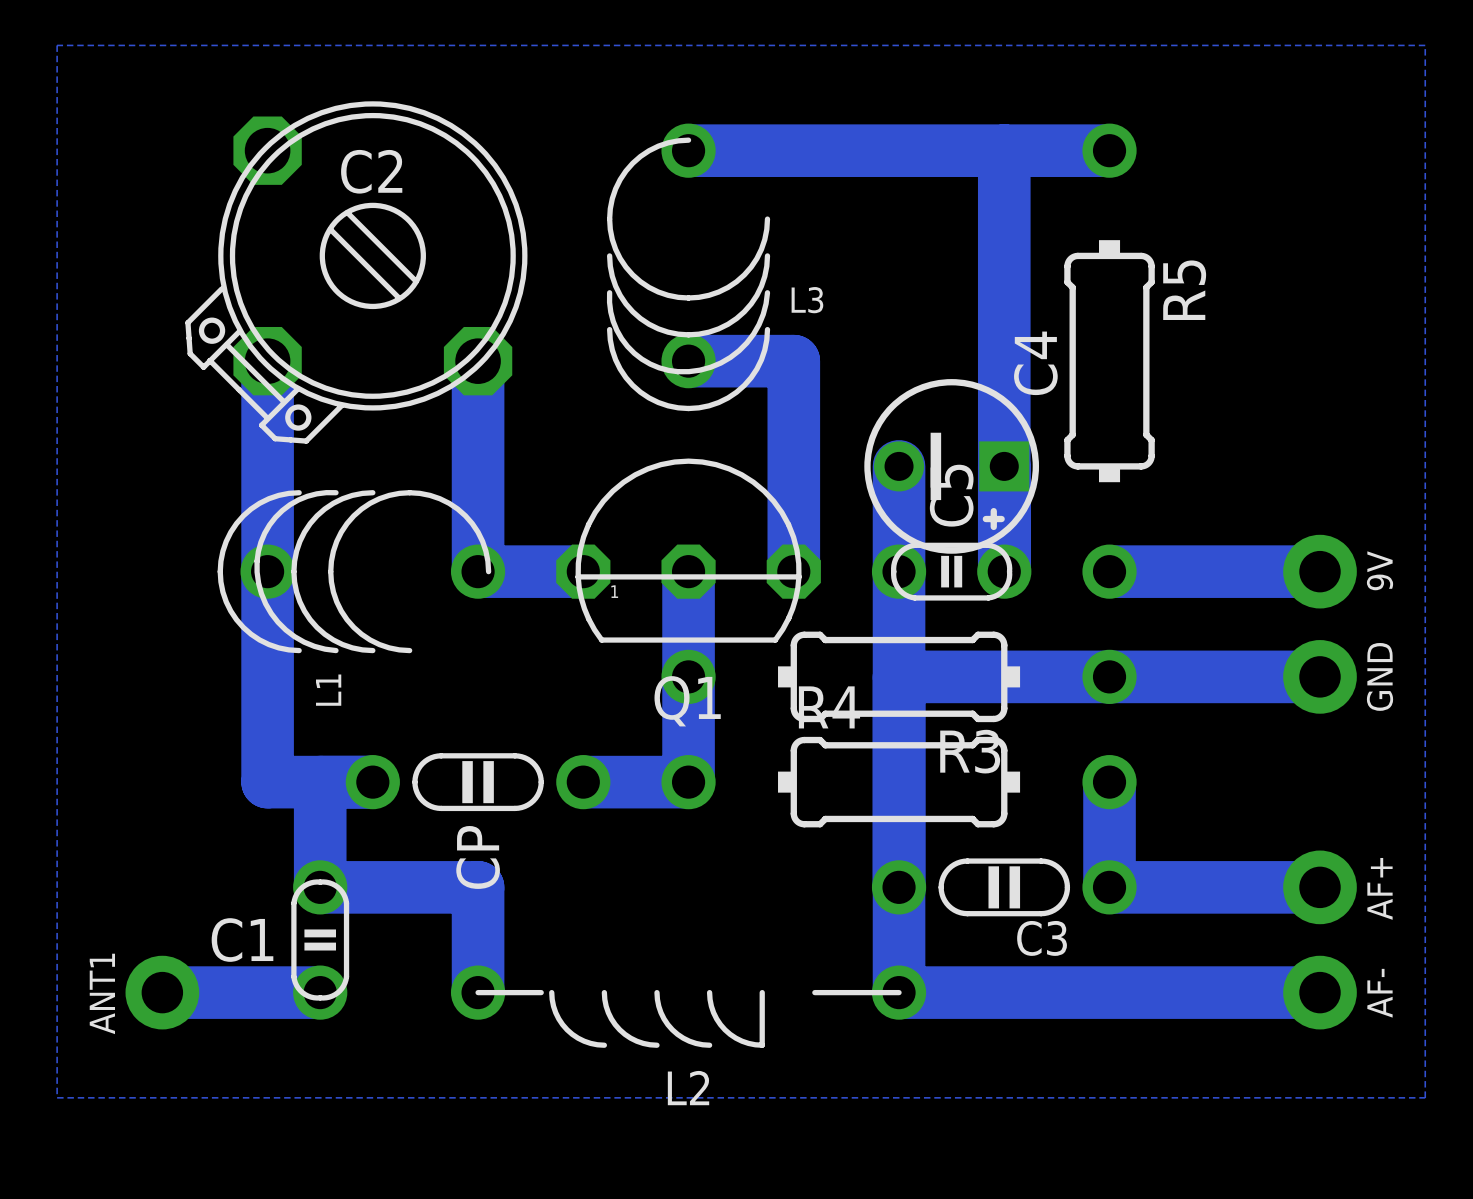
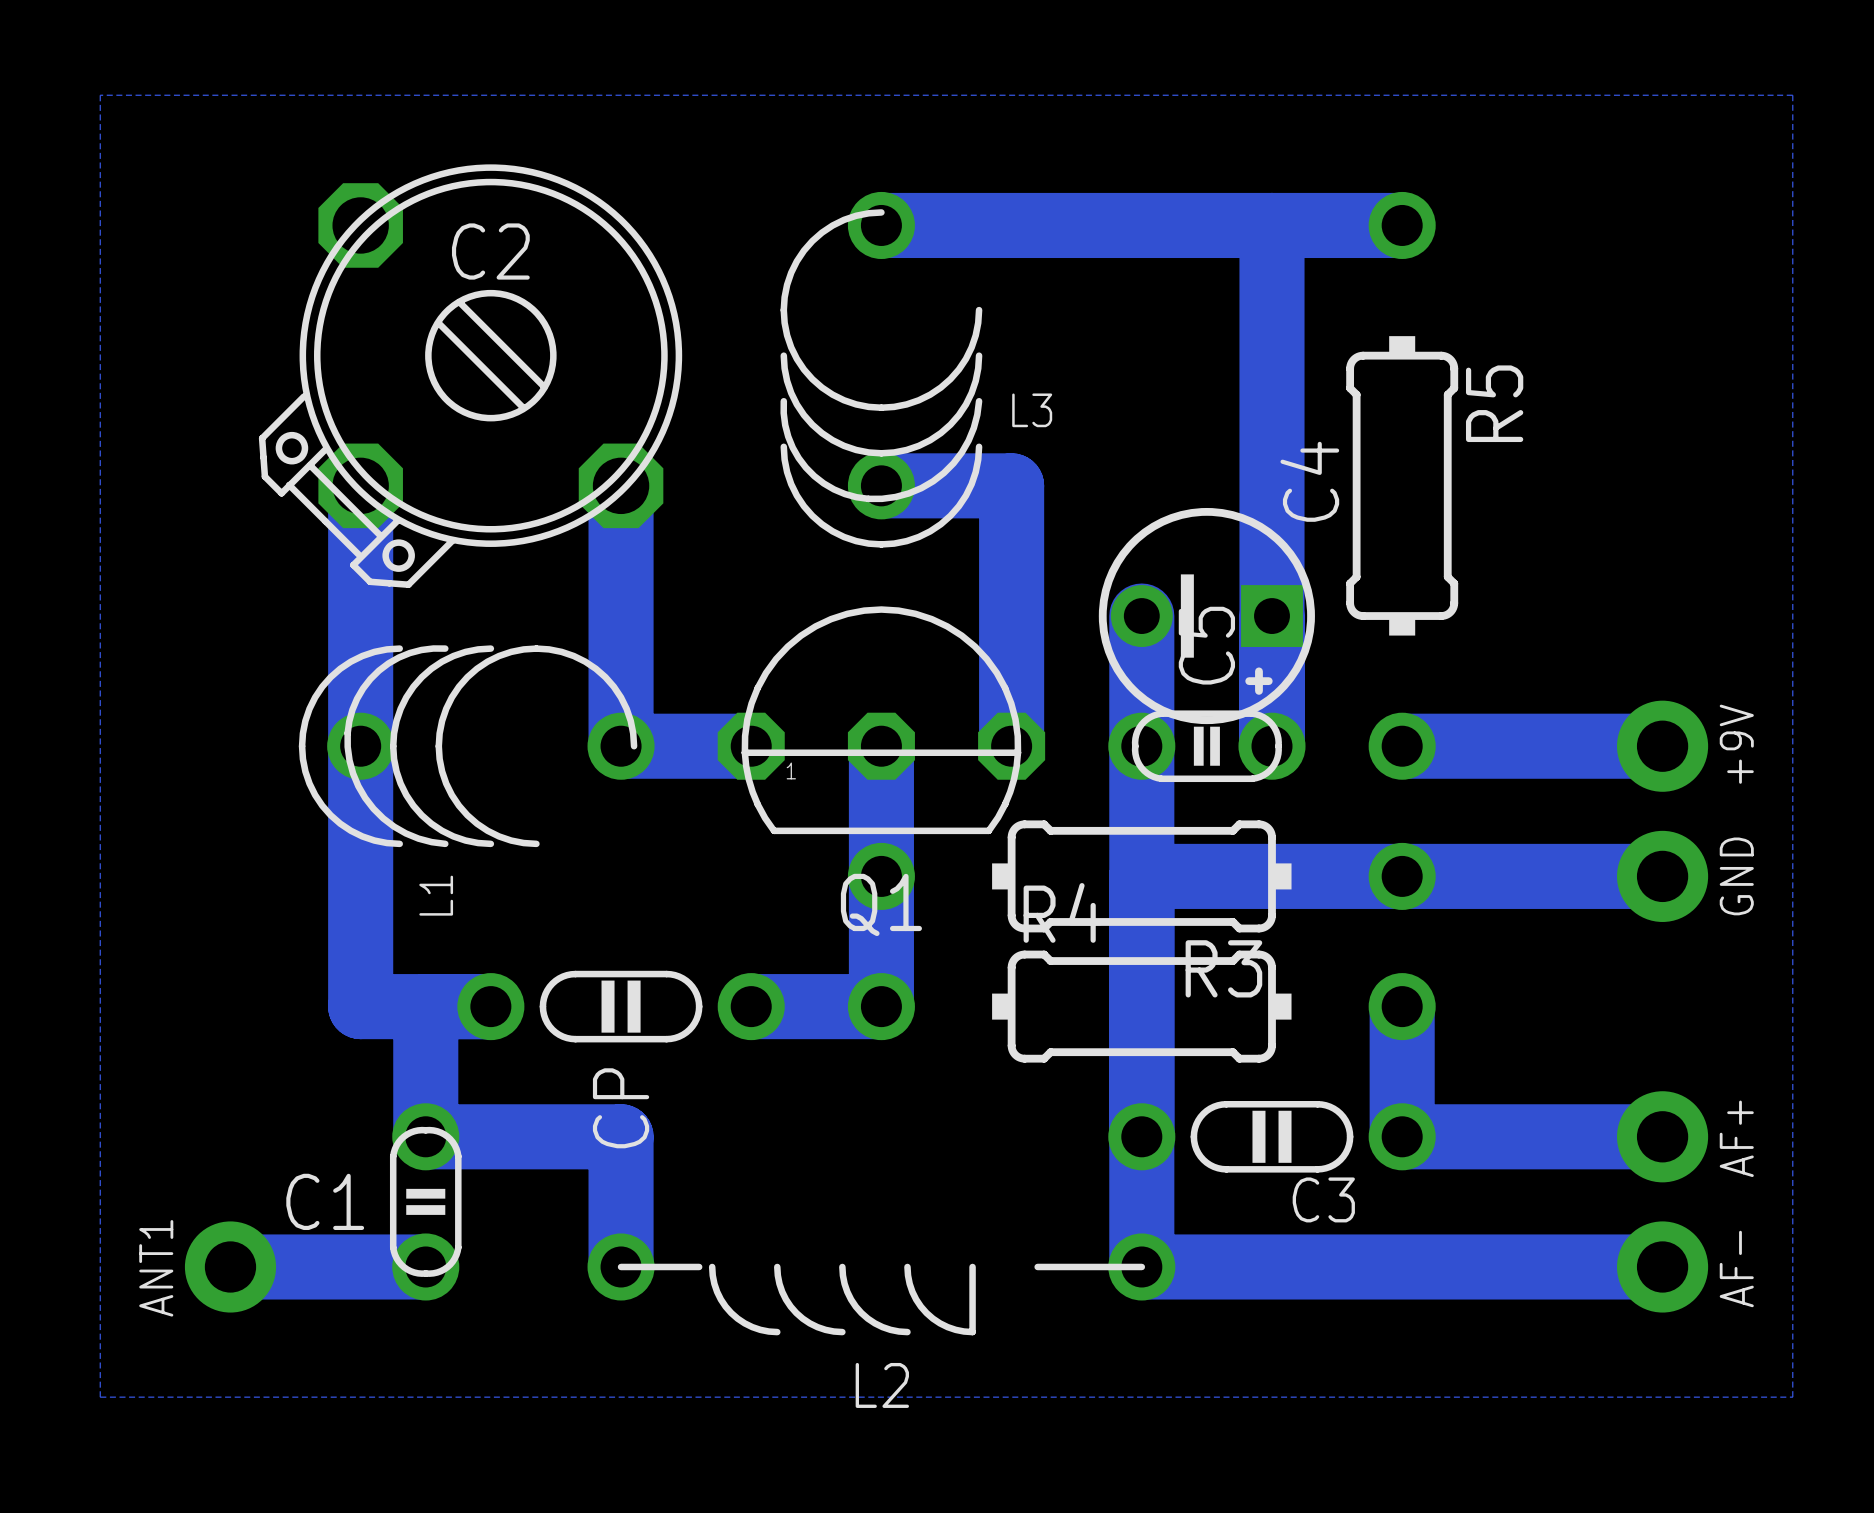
9V name: 9V (1380, 570) -> +9V (1736, 744)

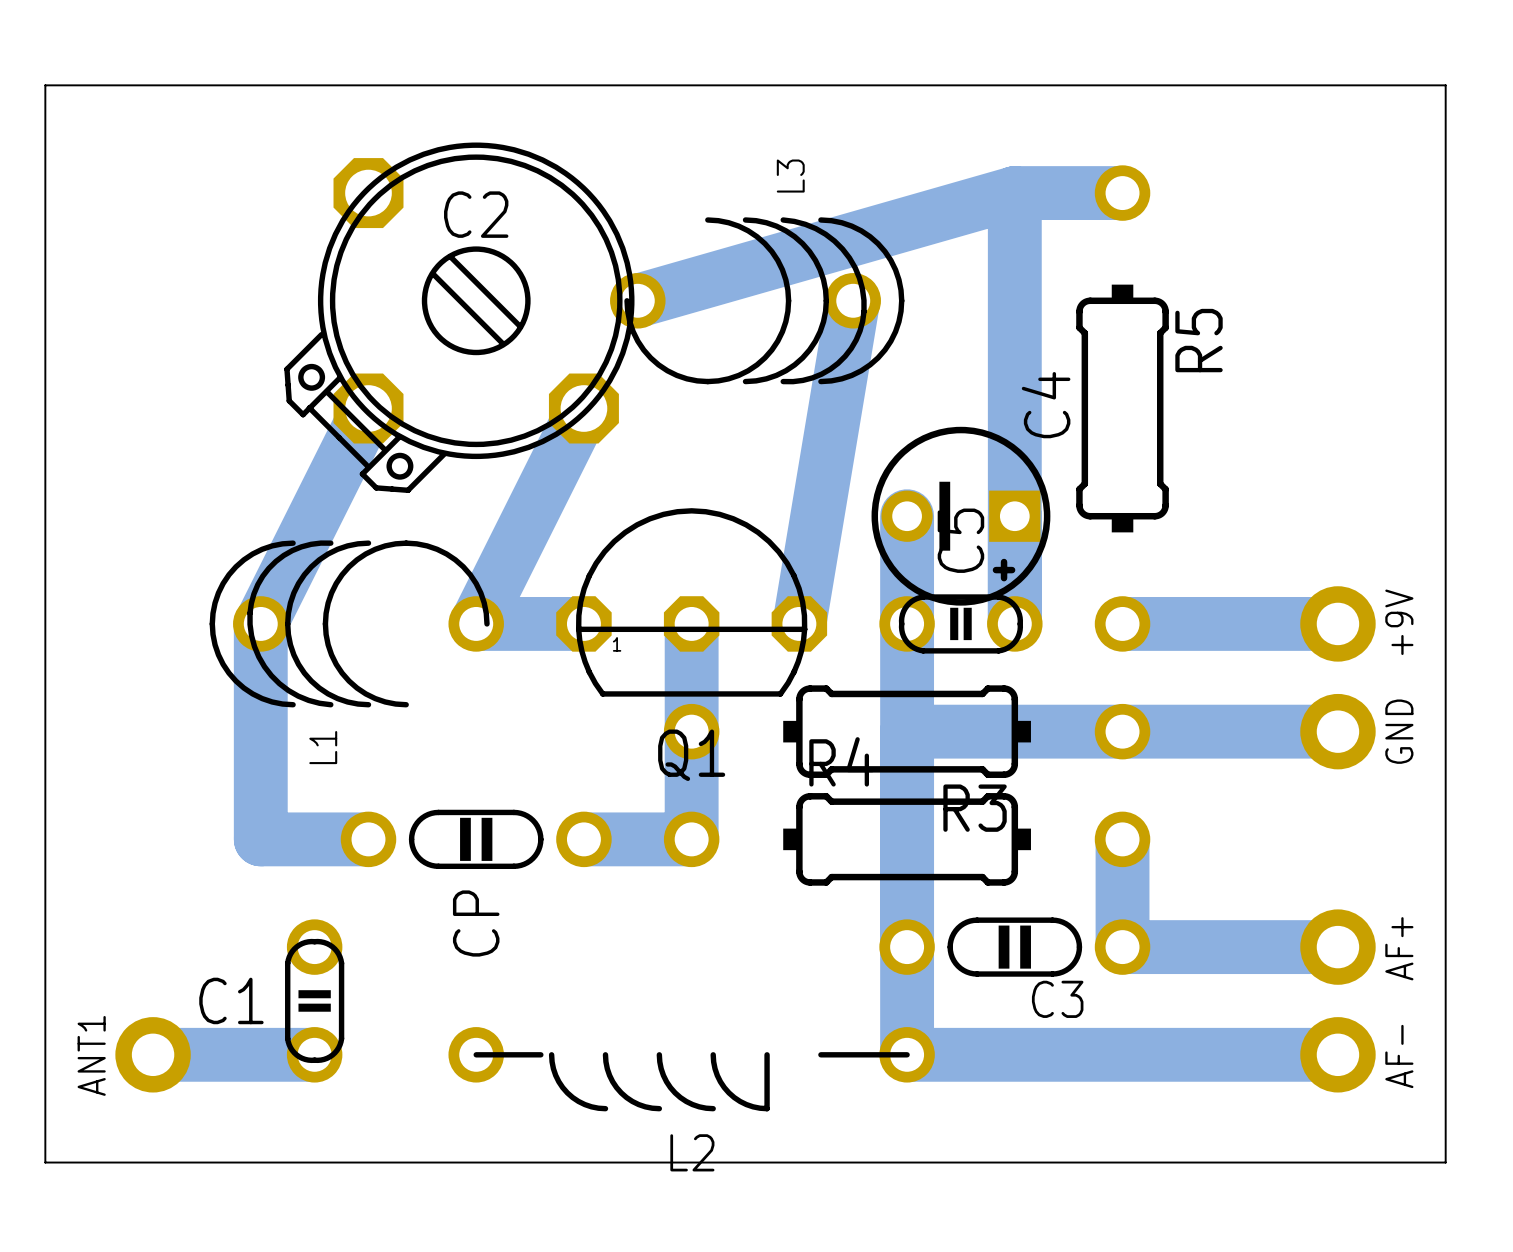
bottom zone outline: (100, 95) (1792, 95) (1792, 1397) (100, 1397) (100, 95) -> none
board edge: none -> (45, 85) (1445, 85) (1445, 1162) (45, 1162) (45, 85)
bottom track: (881, 225) (1271, 225) -> (637, 300) (1014, 193)
L3 rotation: 0° (881, 369) -> 90° counterclockwise (757, 300)
C2 position: (470, 376) -> (459, 317)
bottom track: (360, 485) (360, 746) -> (368, 408) (260, 623)
bottom track: (621, 485) (621, 746) -> (583, 408) (476, 623)
bottom track: (881, 485) (1011, 485) (1011, 746) -> (853, 300) (799, 623)
bottom track: (425, 1006) (425, 1136) (621, 1136) (621, 1266) -> none

